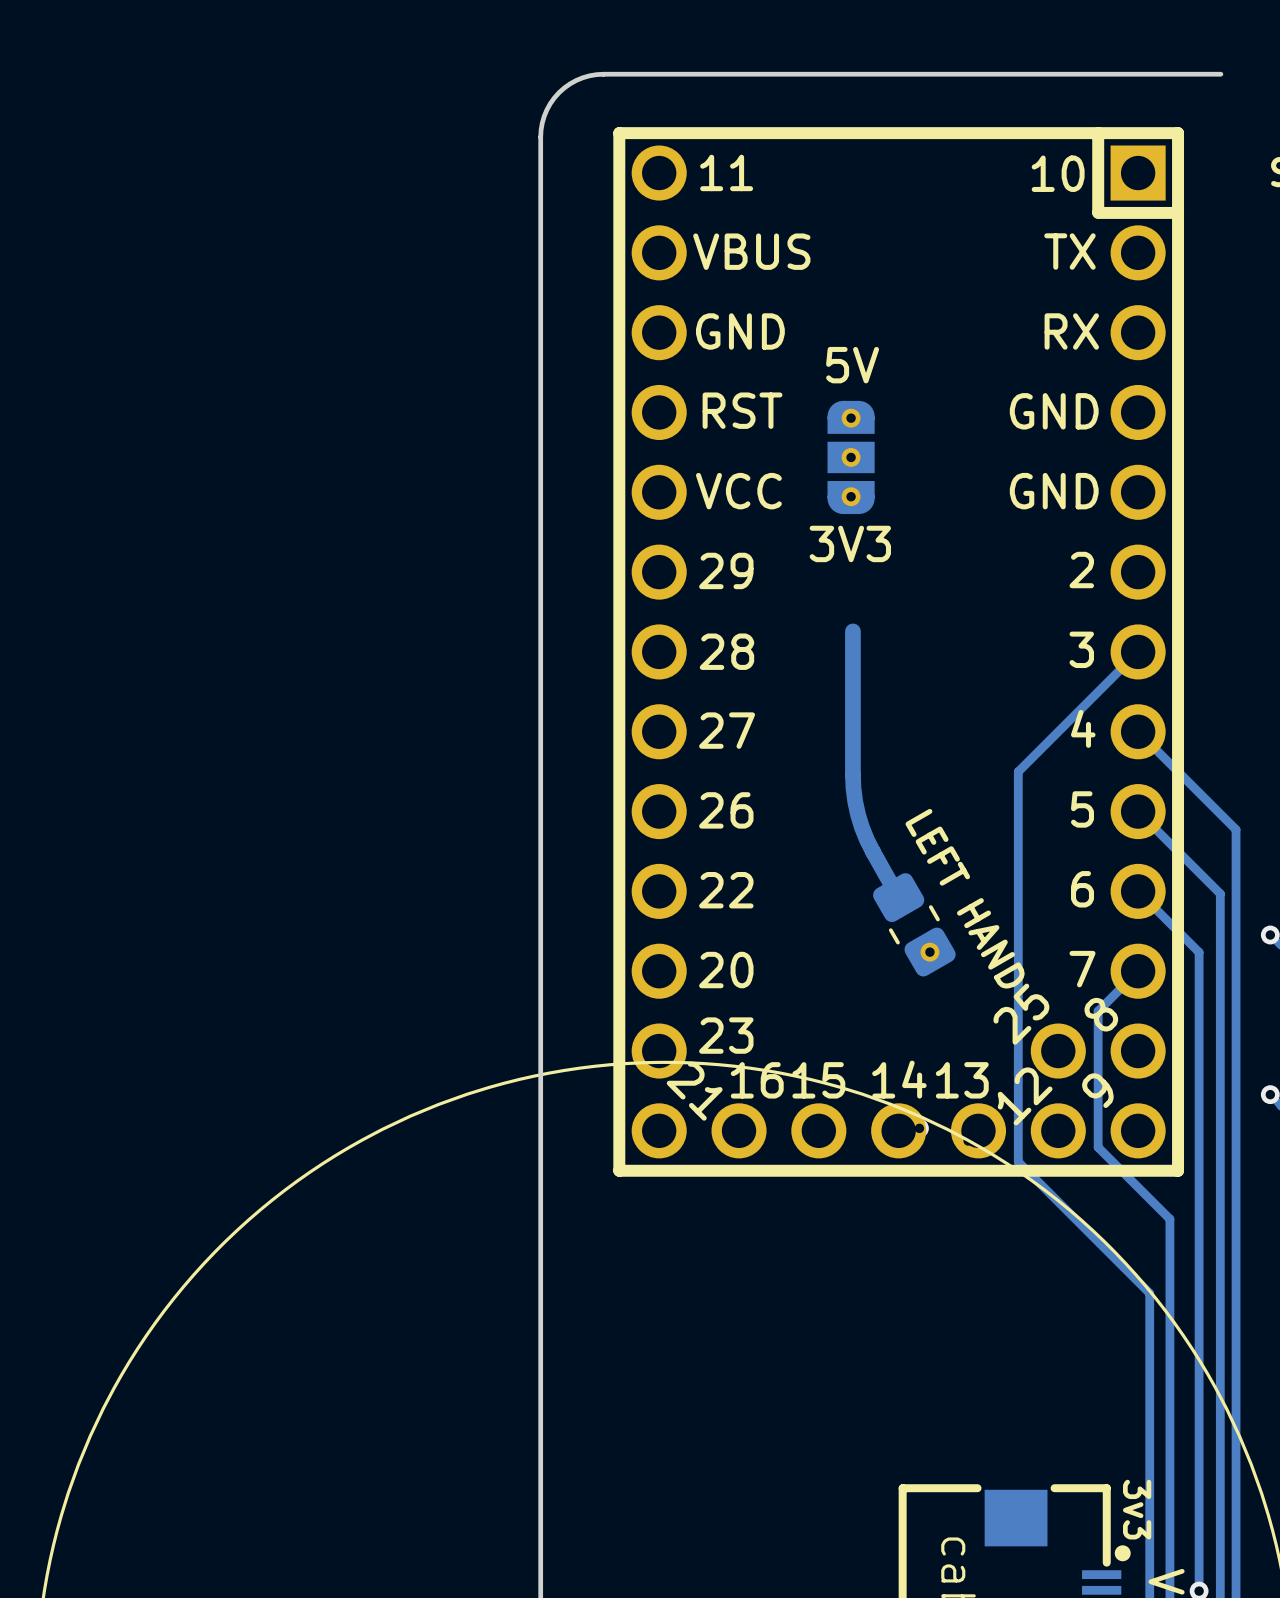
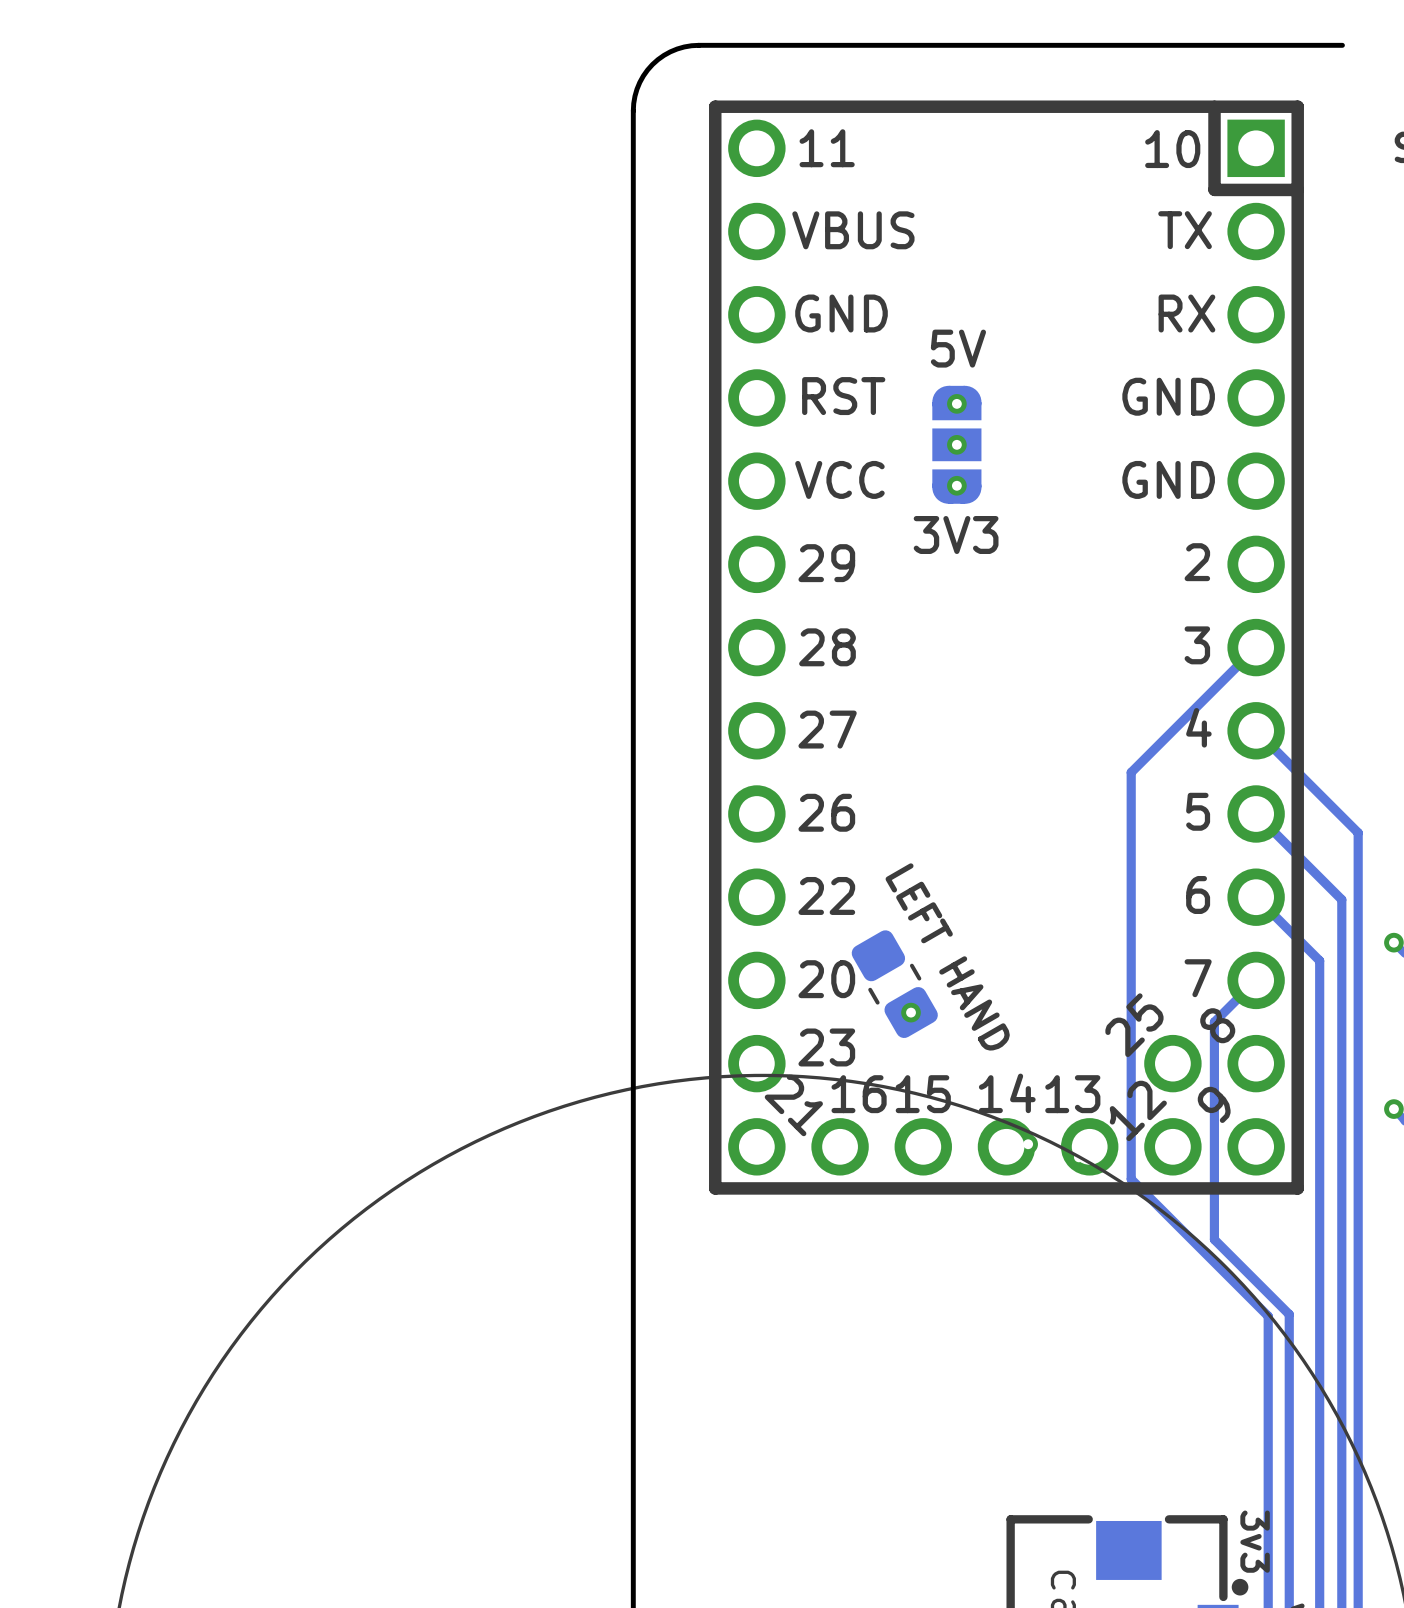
track: (852, 631) (852, 775) (855, 801) (866, 839) (898, 897) -> none
part position: (914, 924) -> (894, 984)
track: (1098, 1147) (1169, 1219) (1169, 1291) -> (1214, 1164) (1214, 1239) (1289, 1314)

